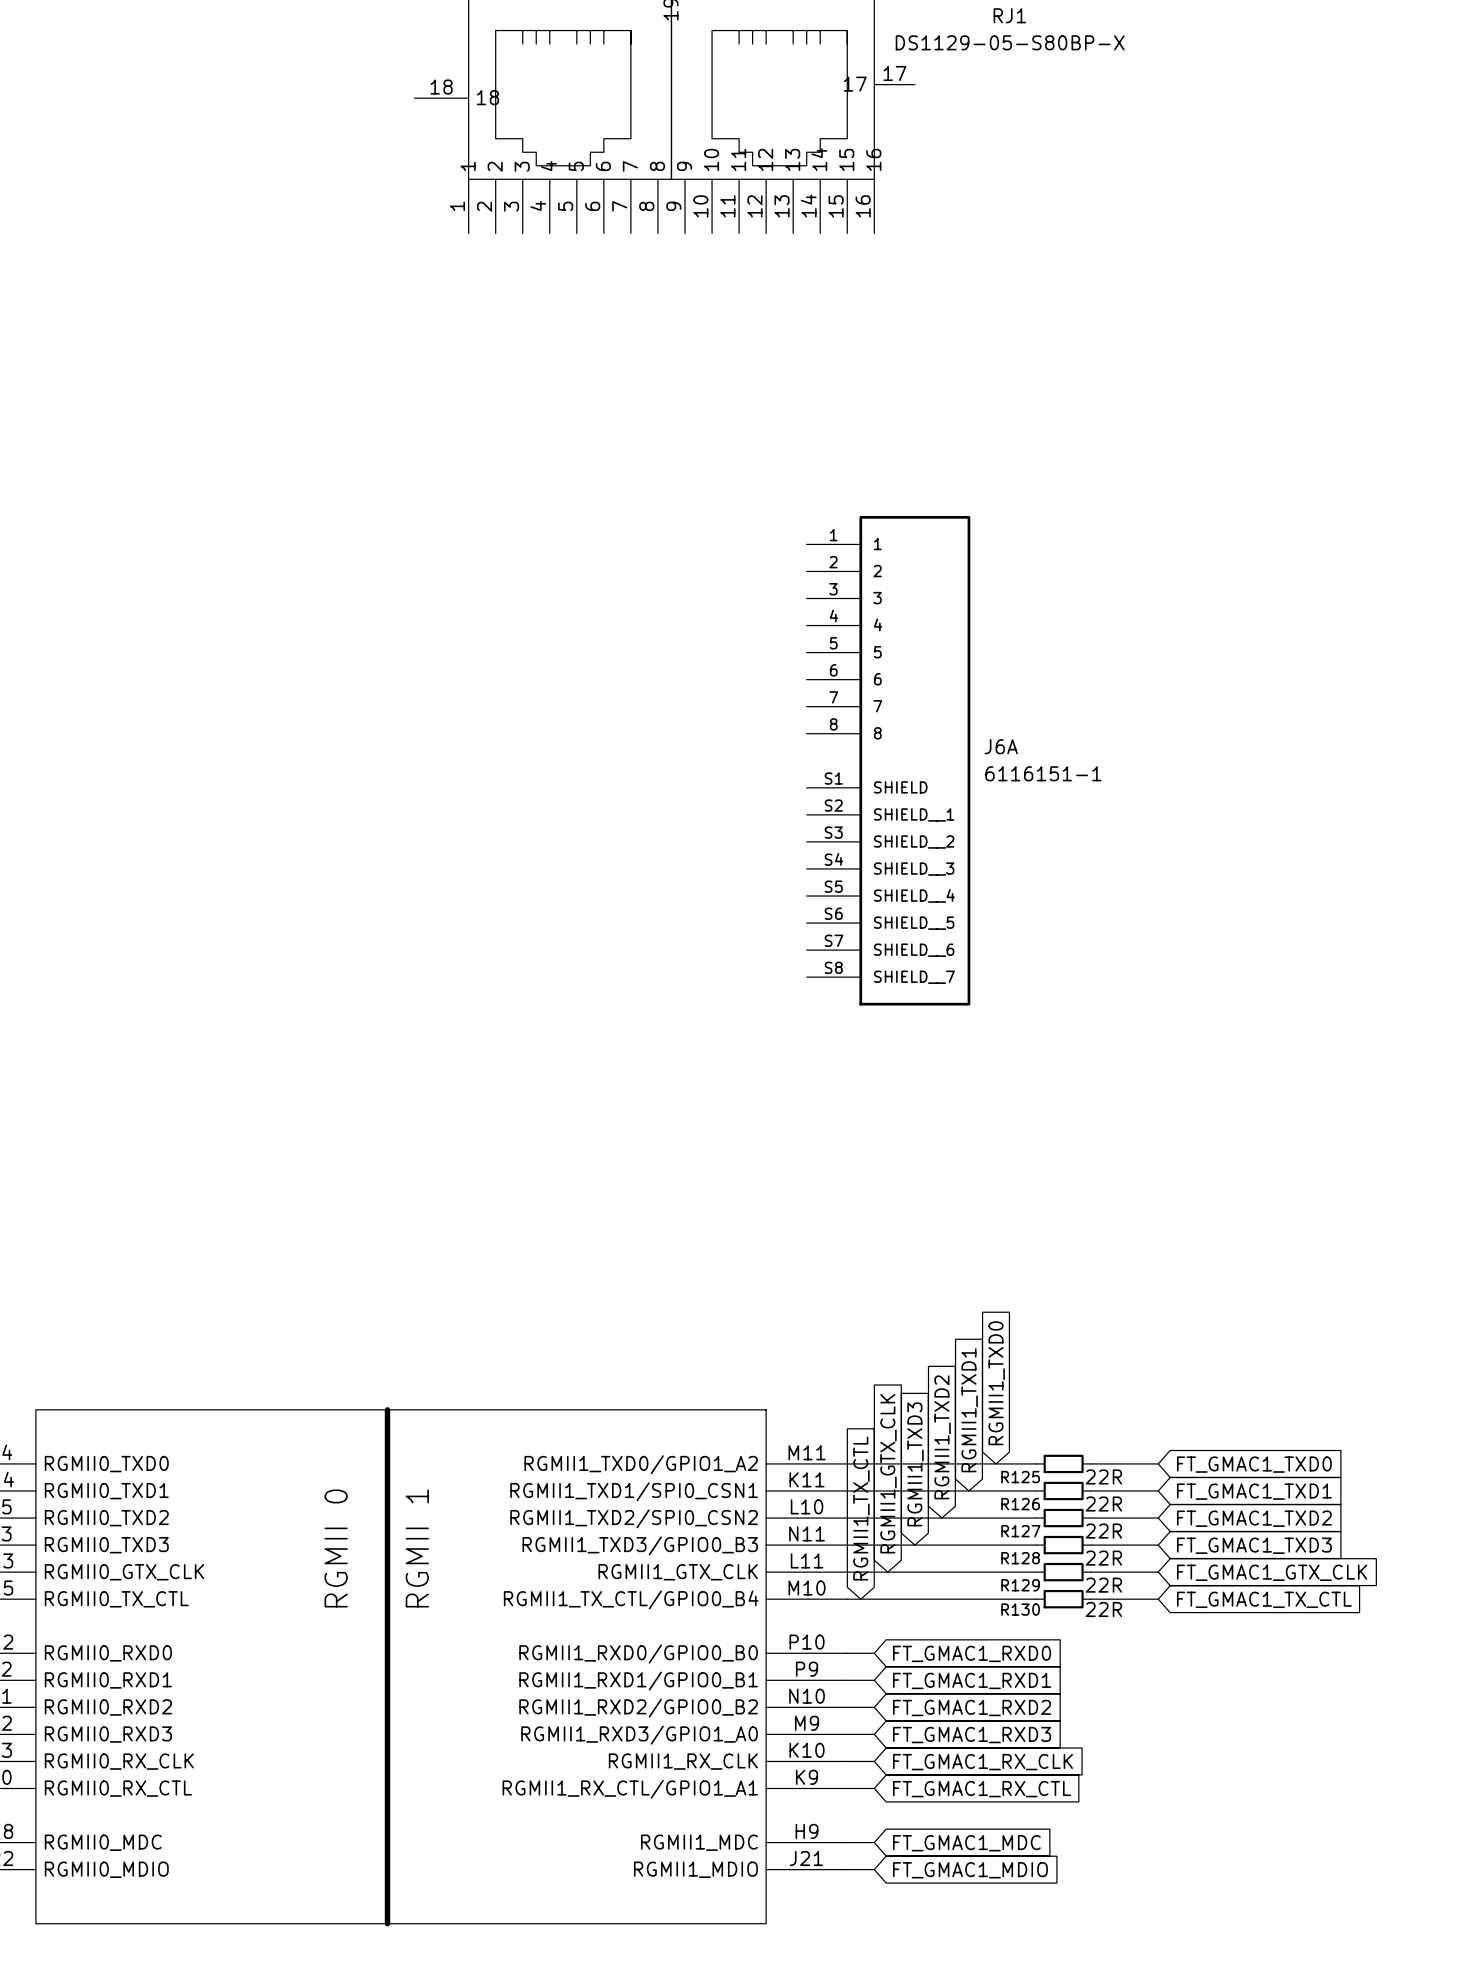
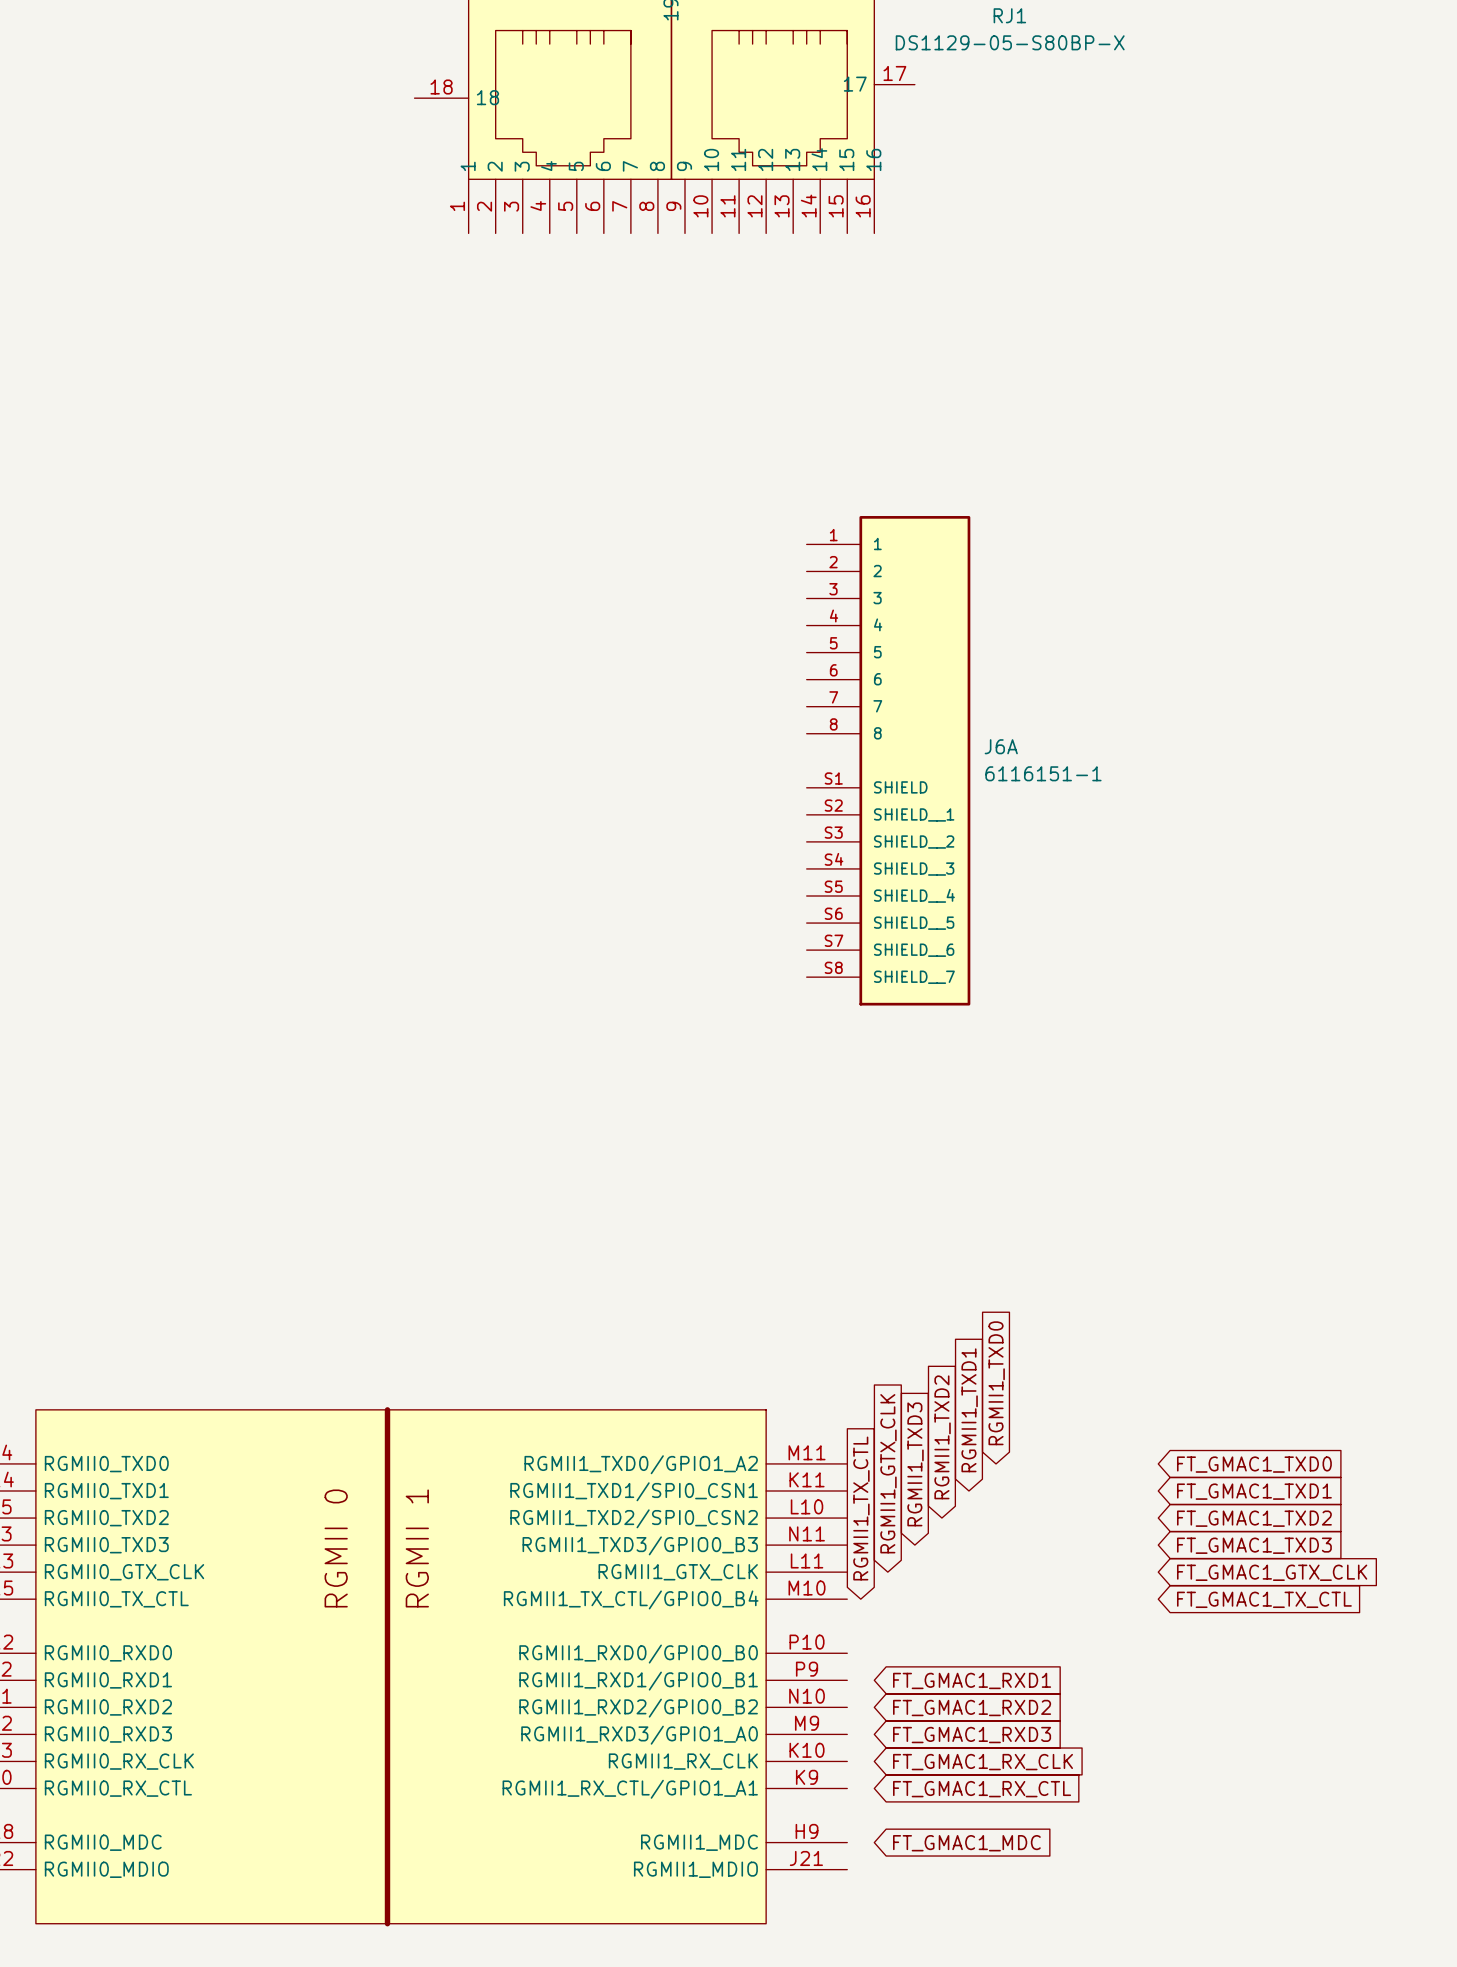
wire: (847, 1463) (1036, 1463) -> none
R125: 22R (1063, 1463) -> none
wire: (1090, 1463) (1158, 1463) -> none
wire: (847, 1490) (1036, 1490) -> none
R126: 22R (1063, 1490) -> none
wire: (1090, 1490) (1158, 1490) -> none
wire: (847, 1518) (1036, 1518) -> none
R127: 22R (1063, 1518) -> none
wire: (1090, 1518) (1158, 1518) -> none
wire: (847, 1545) (1036, 1545) -> none
R128: 22R (1063, 1545) -> none
wire: (1090, 1545) (1158, 1545) -> none
wire: (847, 1572) (1036, 1572) -> none
R129: 22R (1063, 1572) -> none
wire: (1090, 1572) (1158, 1572) -> none
wire: (847, 1599) (1036, 1599) -> none
R130: 22R (1063, 1599) -> none
wire: (1090, 1599) (1158, 1599) -> none
wire: (847, 1653) (874, 1653) -> none
global label: FT_GMAC1_RXD0 (972, 1653) -> none
wire: (847, 1680) (874, 1680) -> none
wire: (847, 1707) (874, 1707) -> none
wire: (847, 1734) (874, 1734) -> none
wire: (847, 1761) (874, 1761) -> none
wire: (847, 1788) (874, 1788) -> none
wire: (847, 1842) (874, 1842) -> none
wire: (847, 1869) (874, 1869) -> none
global label: FT_GMAC1_MDIO (970, 1870) -> none

